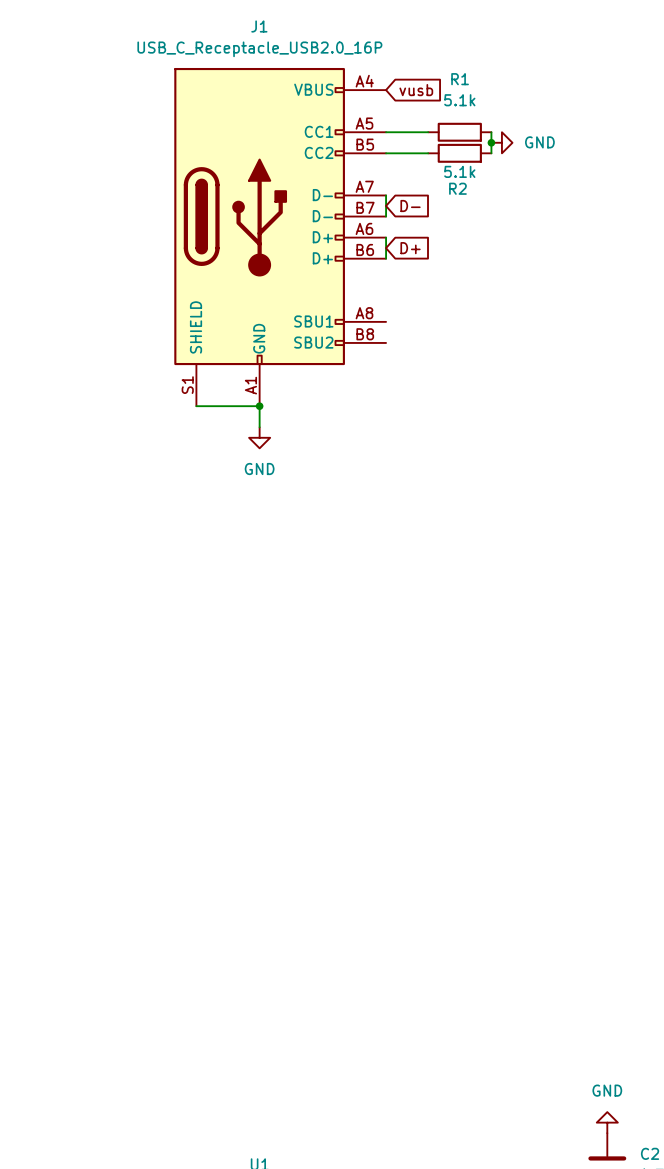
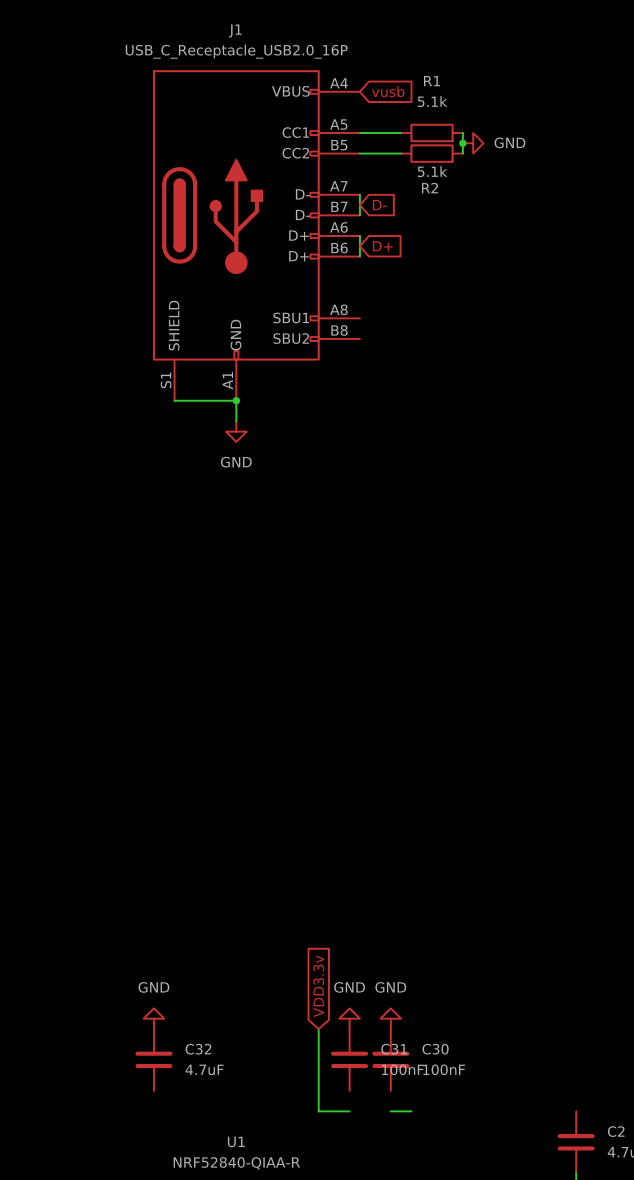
global label: none -> VDD3.3v (318, 986)
power symbol: none -> GND (153, 1018)
power symbol: none -> GND (349, 1018)
power symbol: none -> GND (390, 1018)
wire: none -> (318, 1028) (318, 1111) (349, 1111)
C32: none -> 4.7uF (153, 1059)
C31: none -> 100nF (349, 1059)
C30: none -> 100nF (390, 1059)
power symbol: GND (607, 1122) -> none
wire: none -> (390, 1111) (411, 1111)

